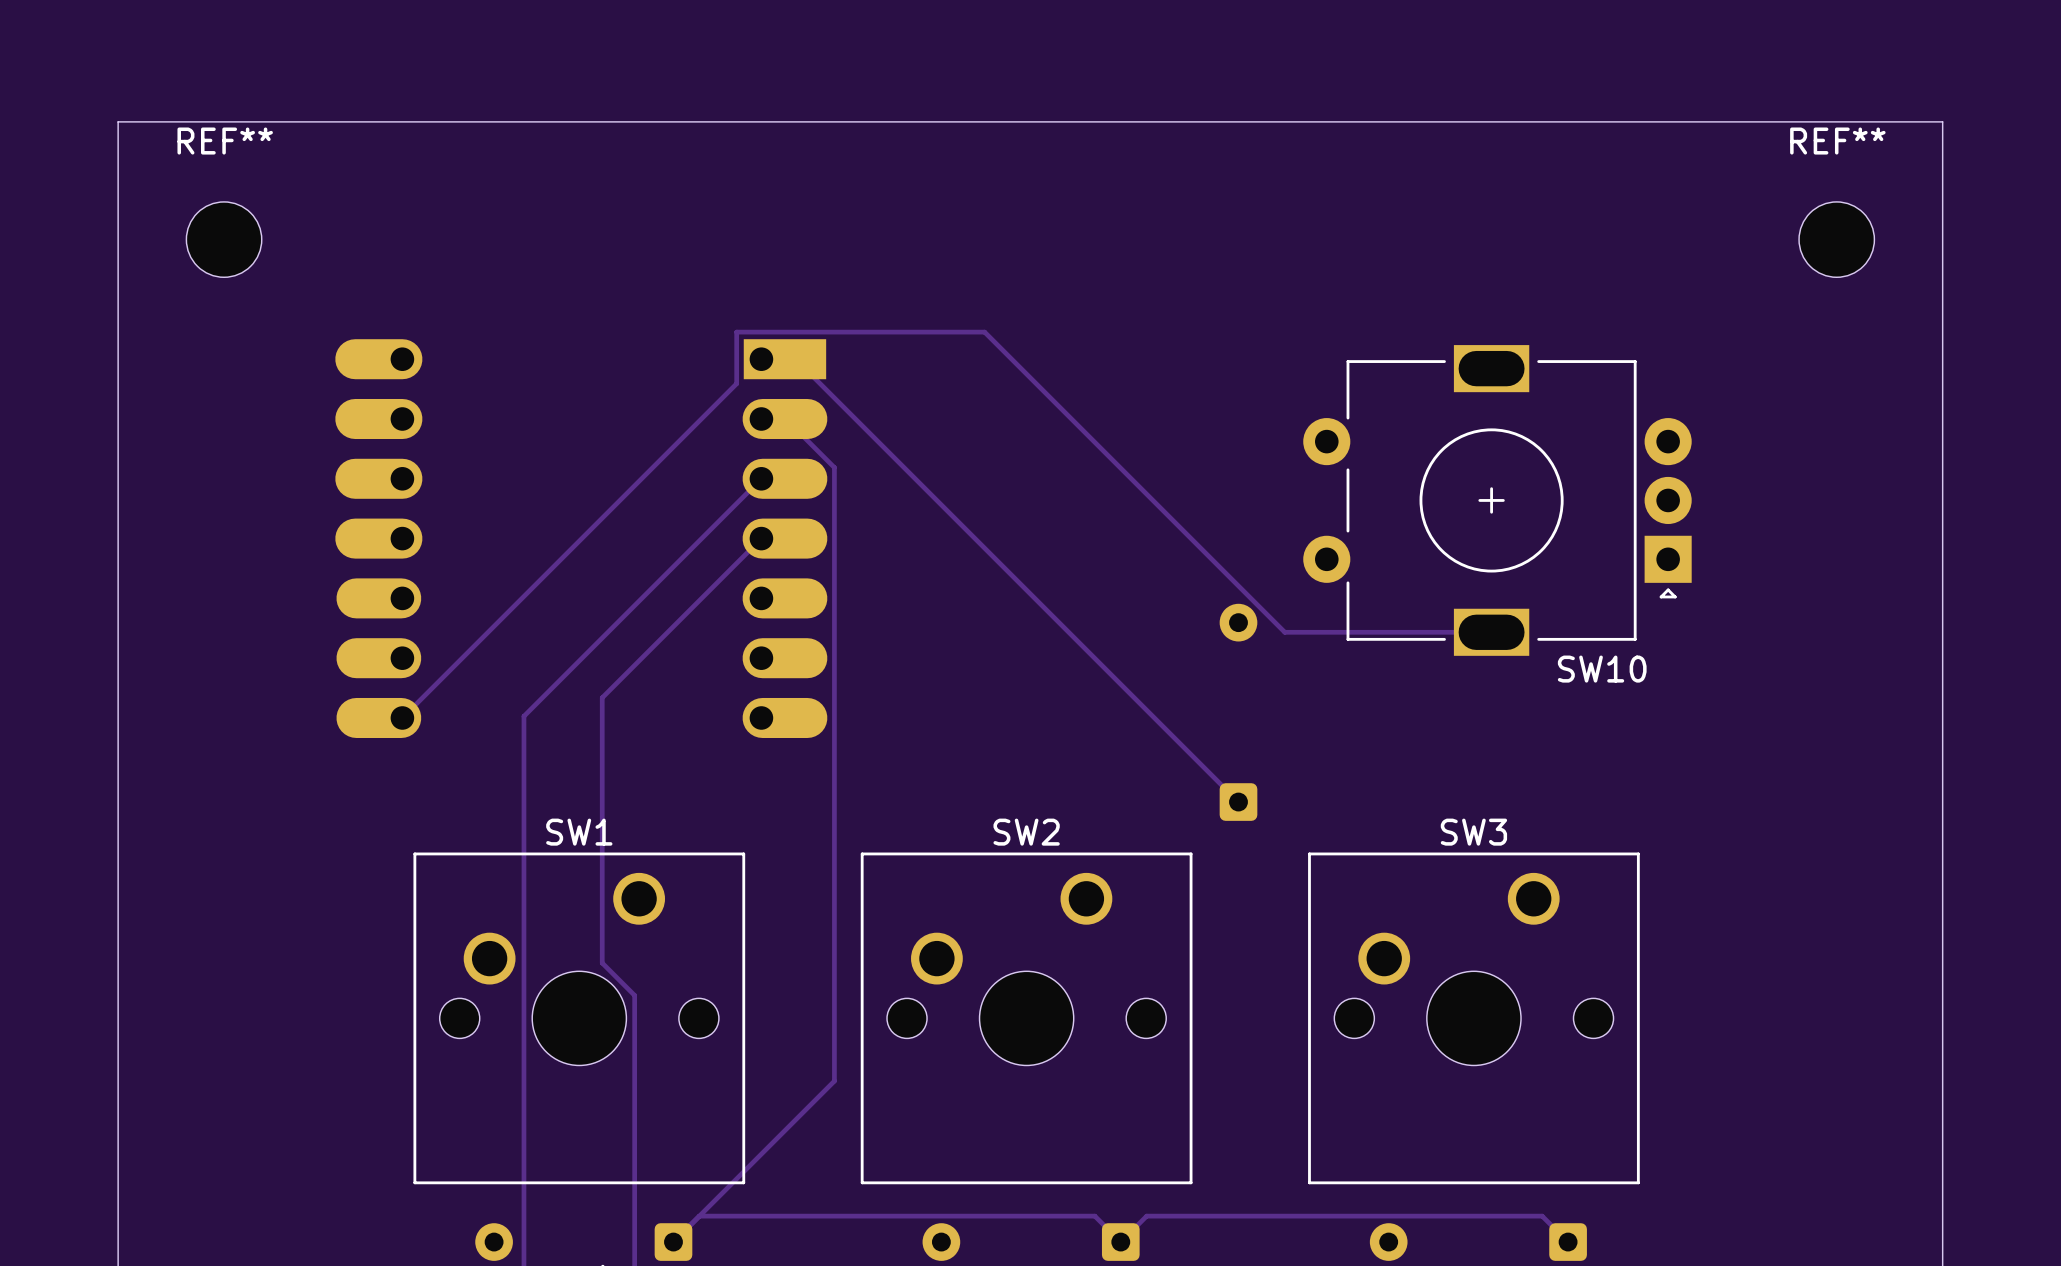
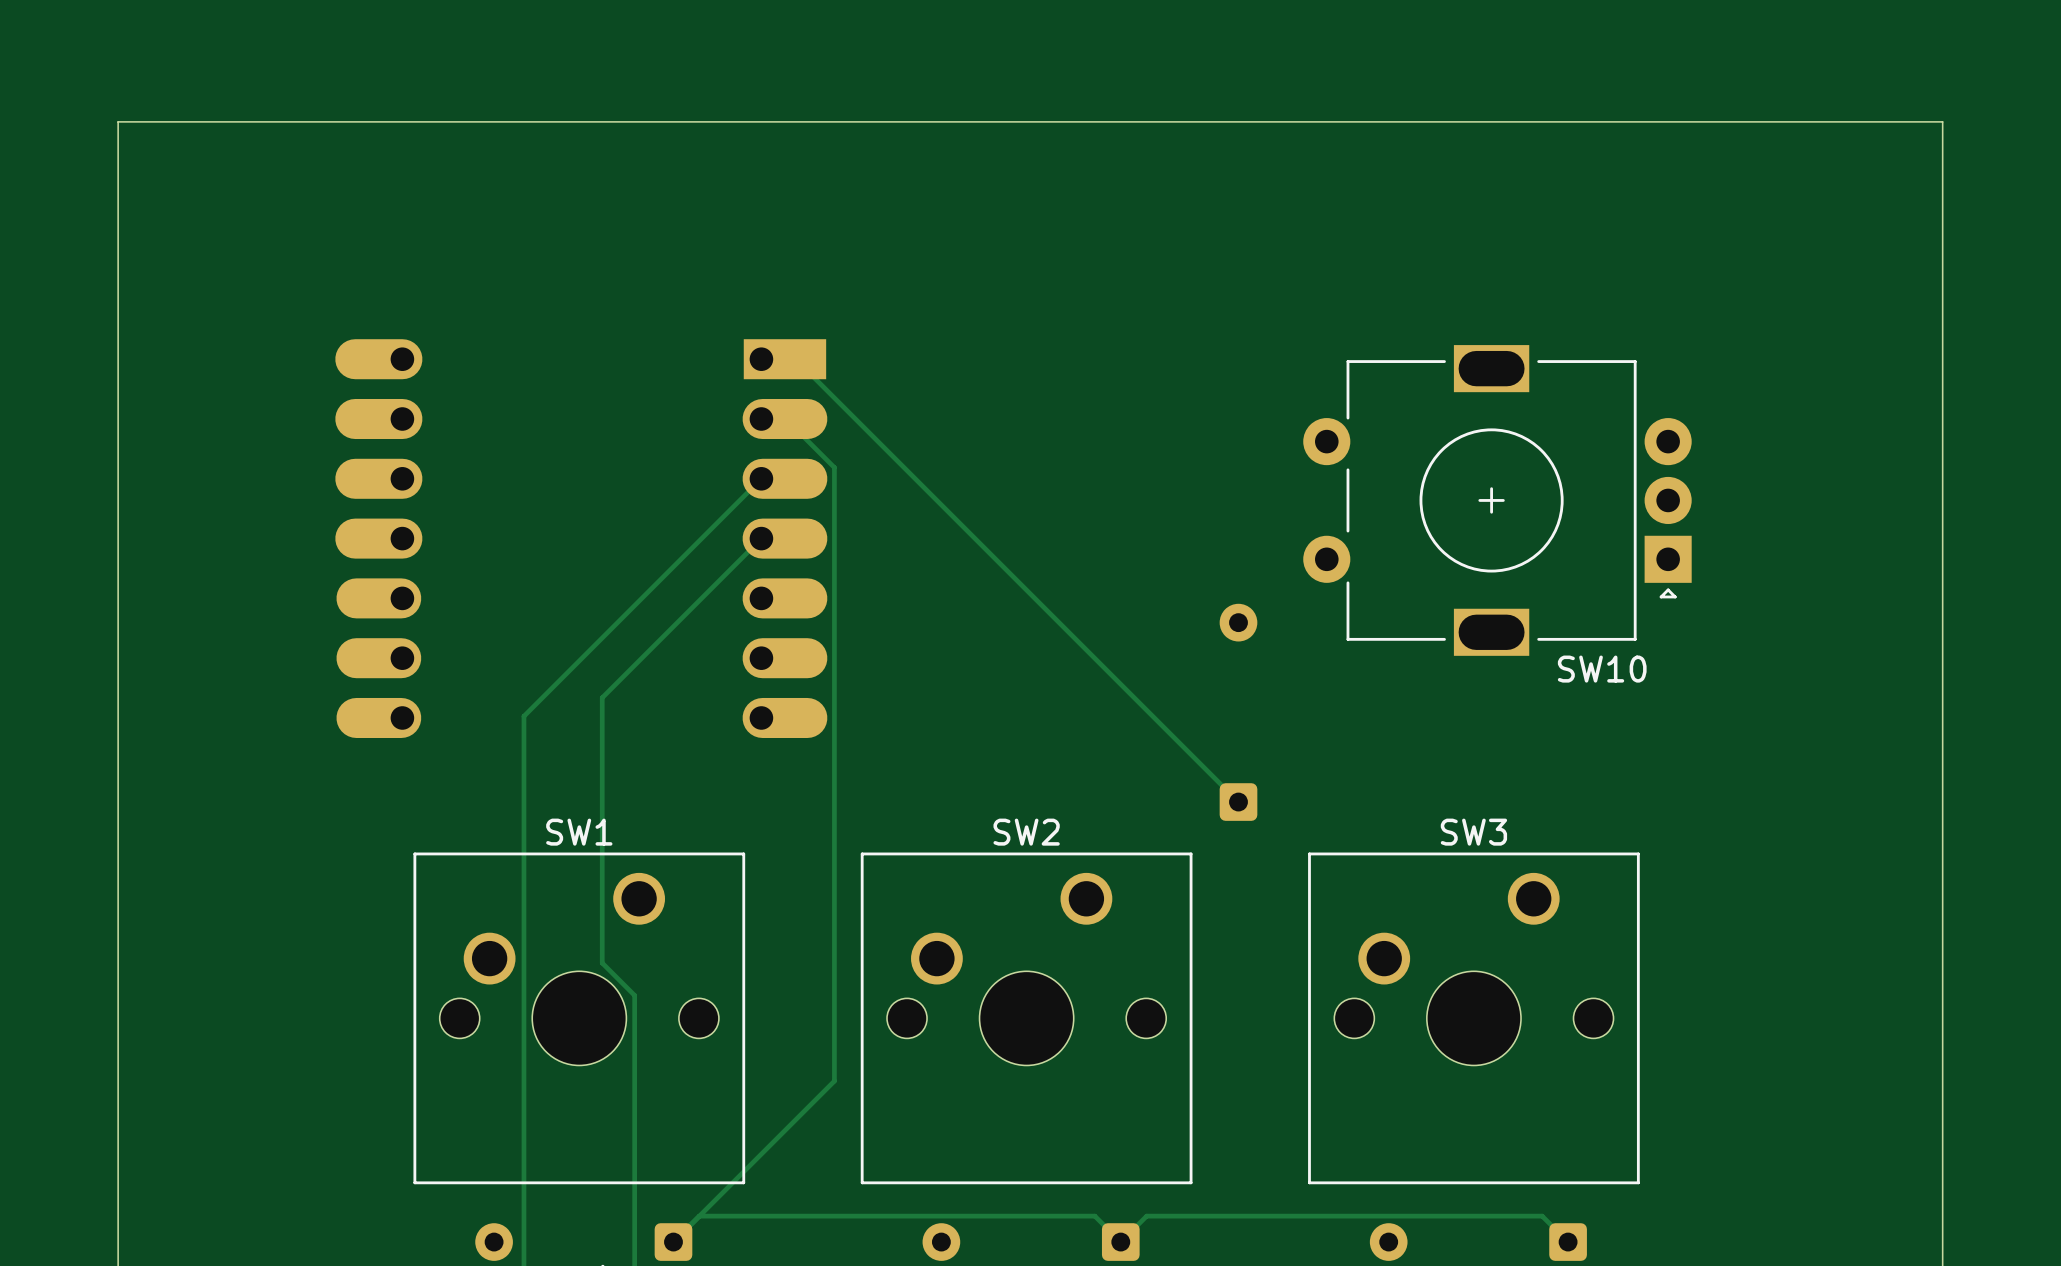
REF**: (224, 239) -> none
REF**: (1836, 239) -> none
track: (1491, 632) (1284, 632) (984, 332) (736, 332) (736, 383) (402, 717) -> none

